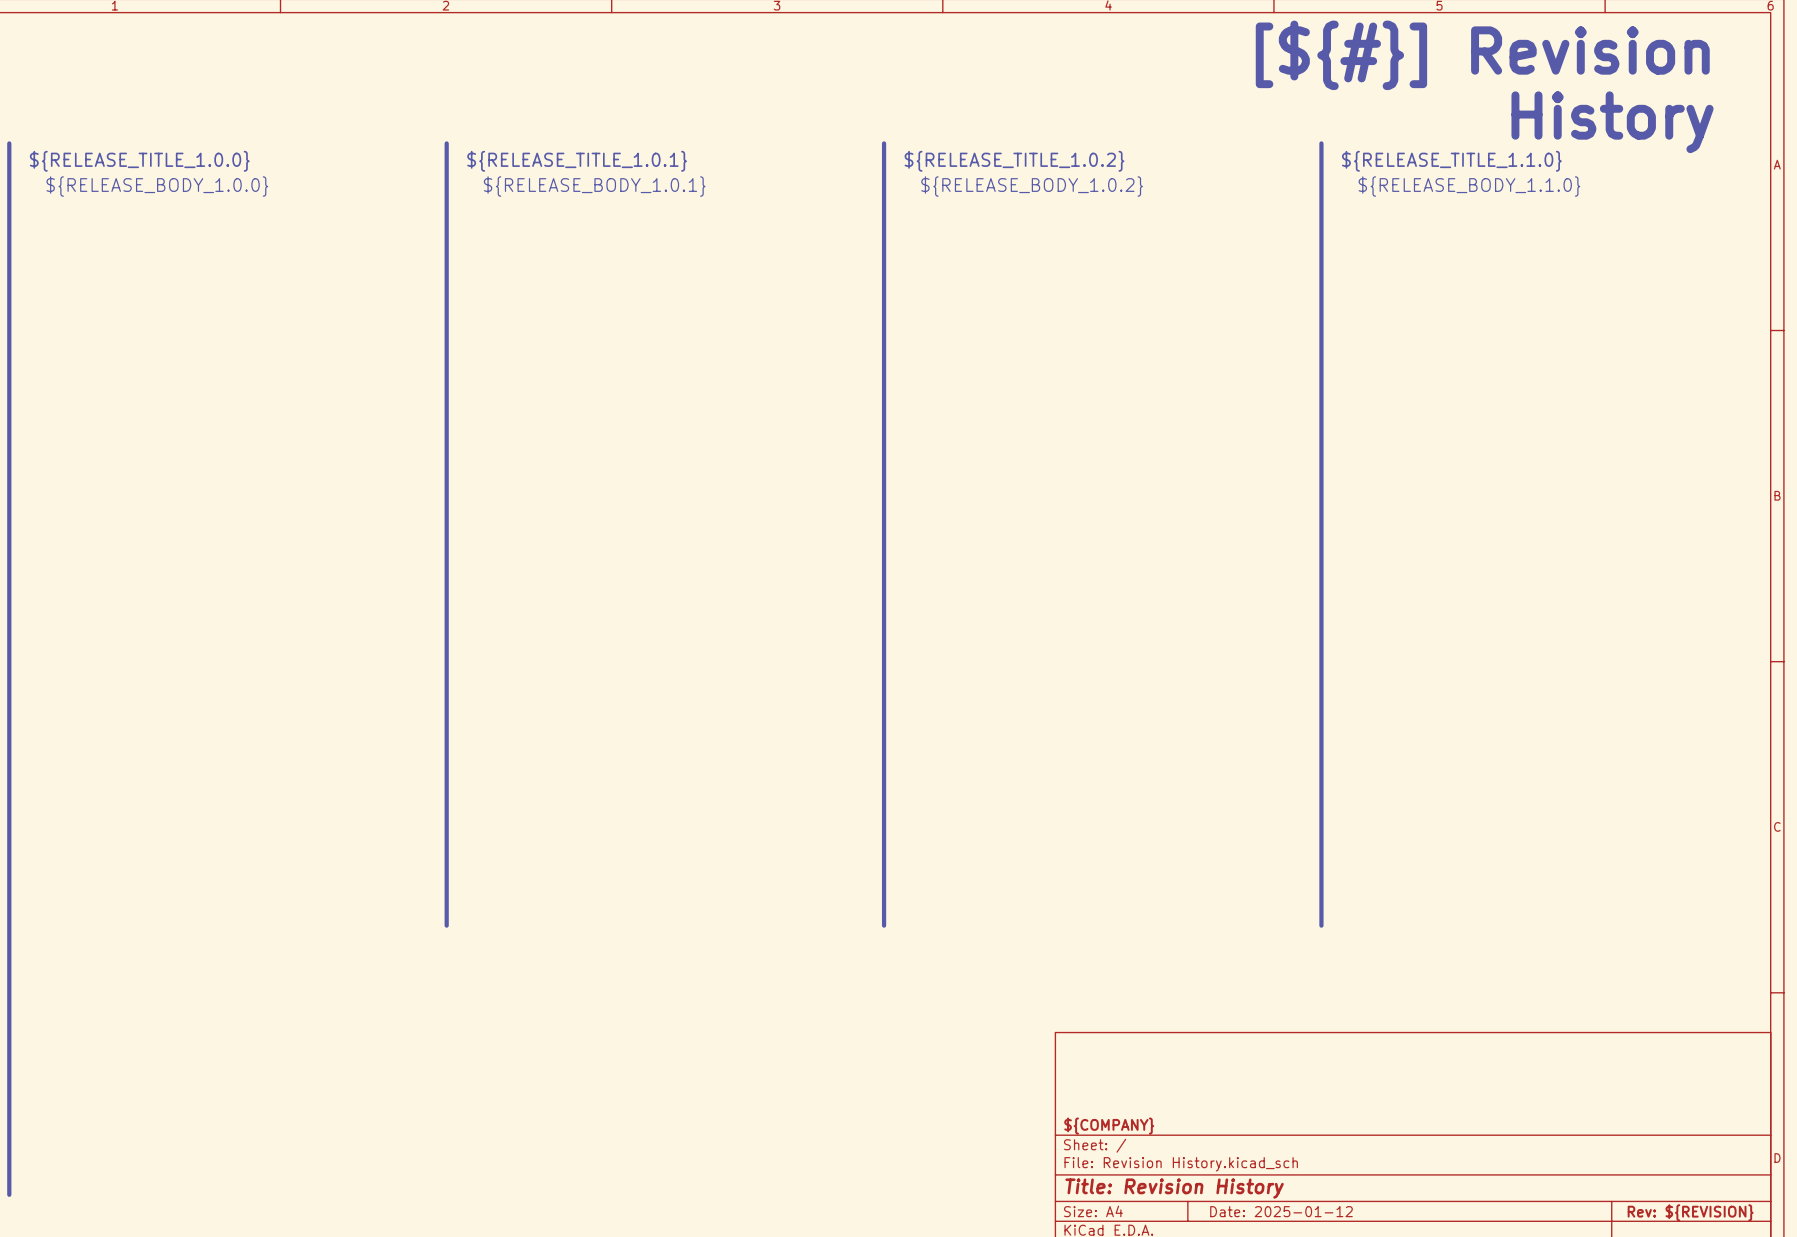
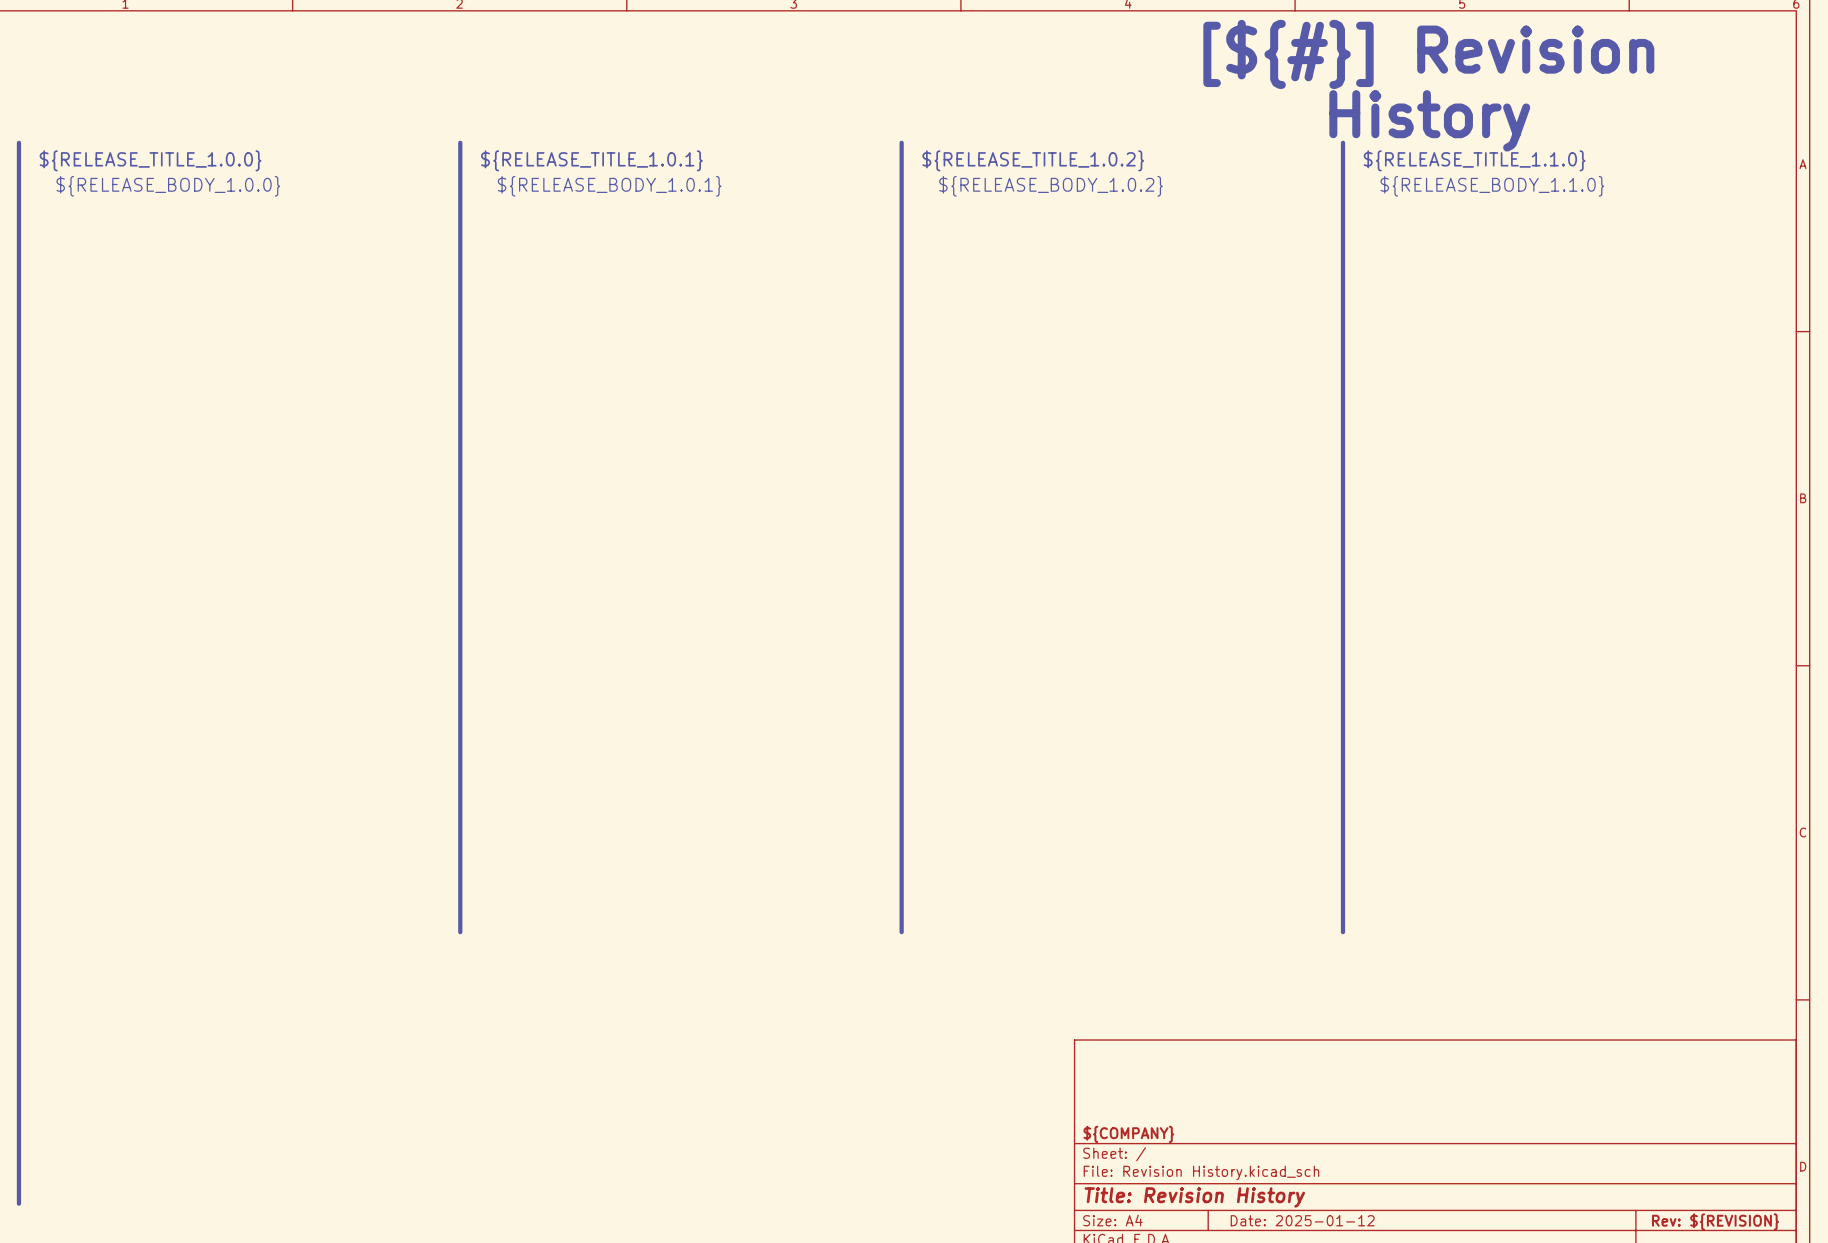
text: none -> [${#}] Revision (1428, 54)
text: [${#}] Revision (1482, 55) -> none
text: none -> History (1429, 120)
text: History (1612, 122) -> none

